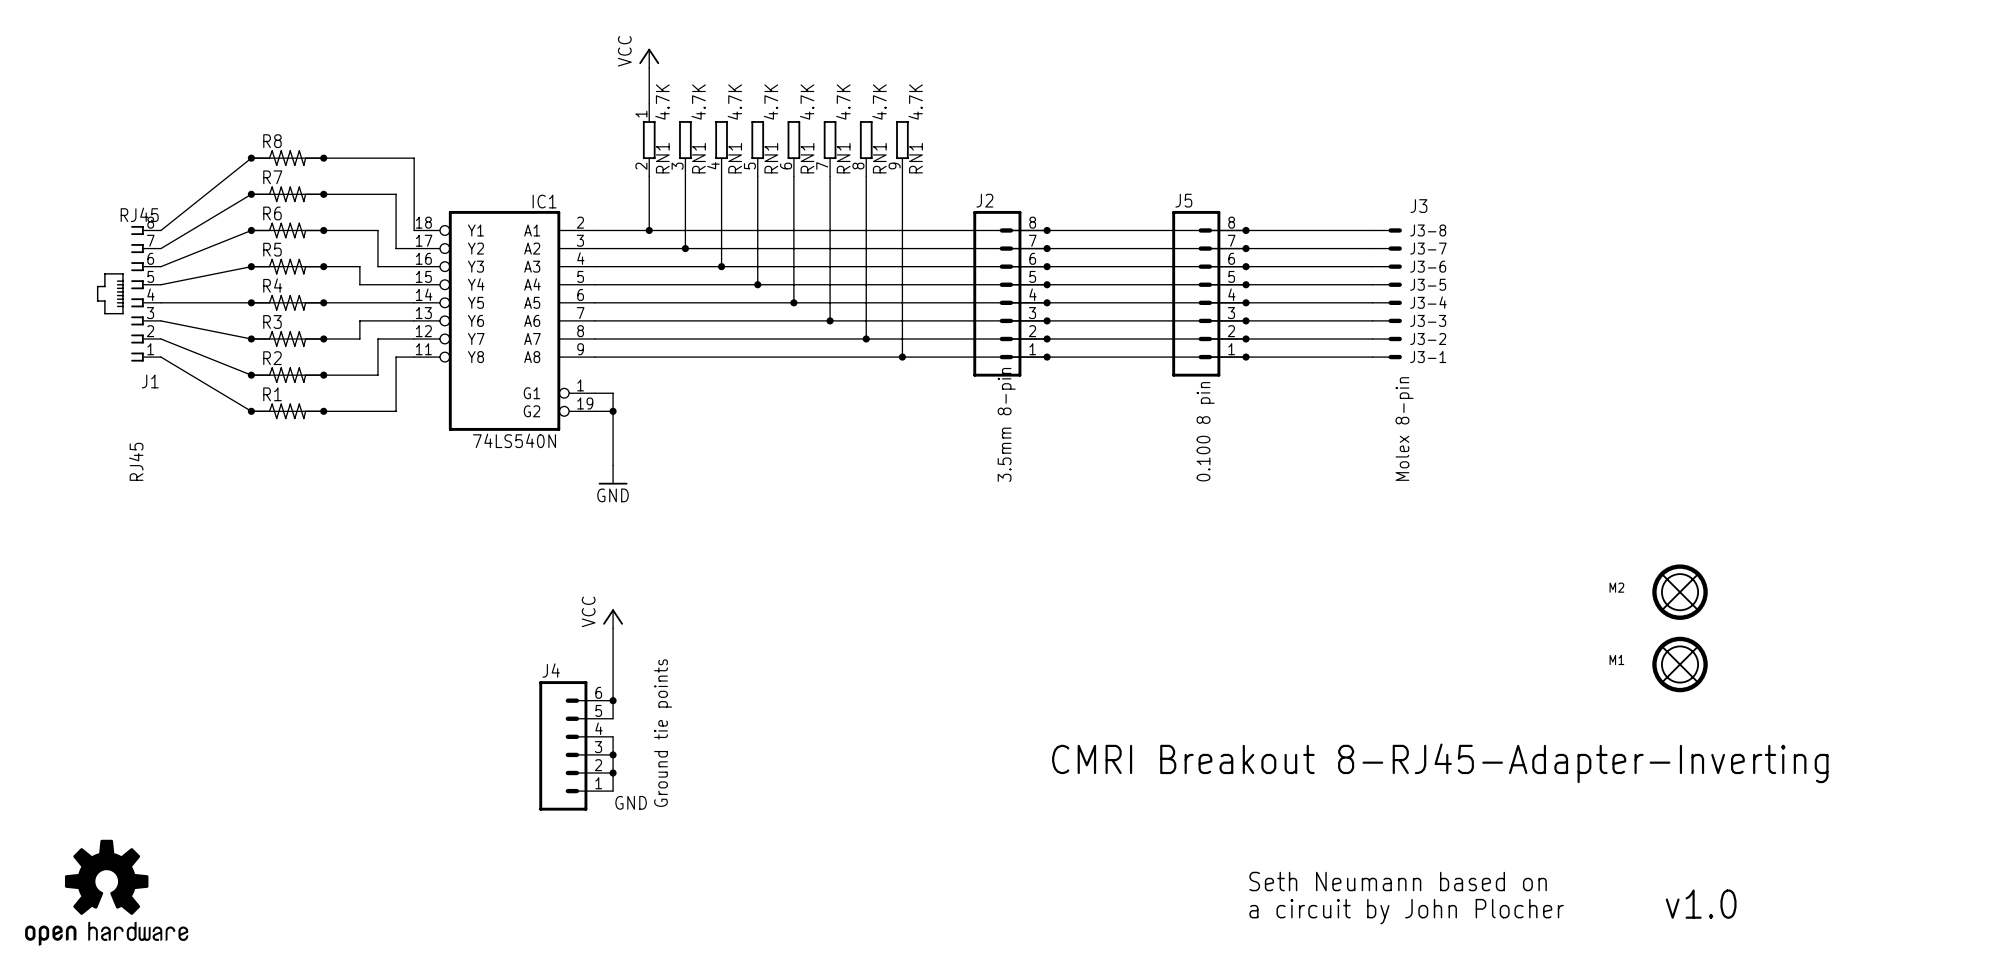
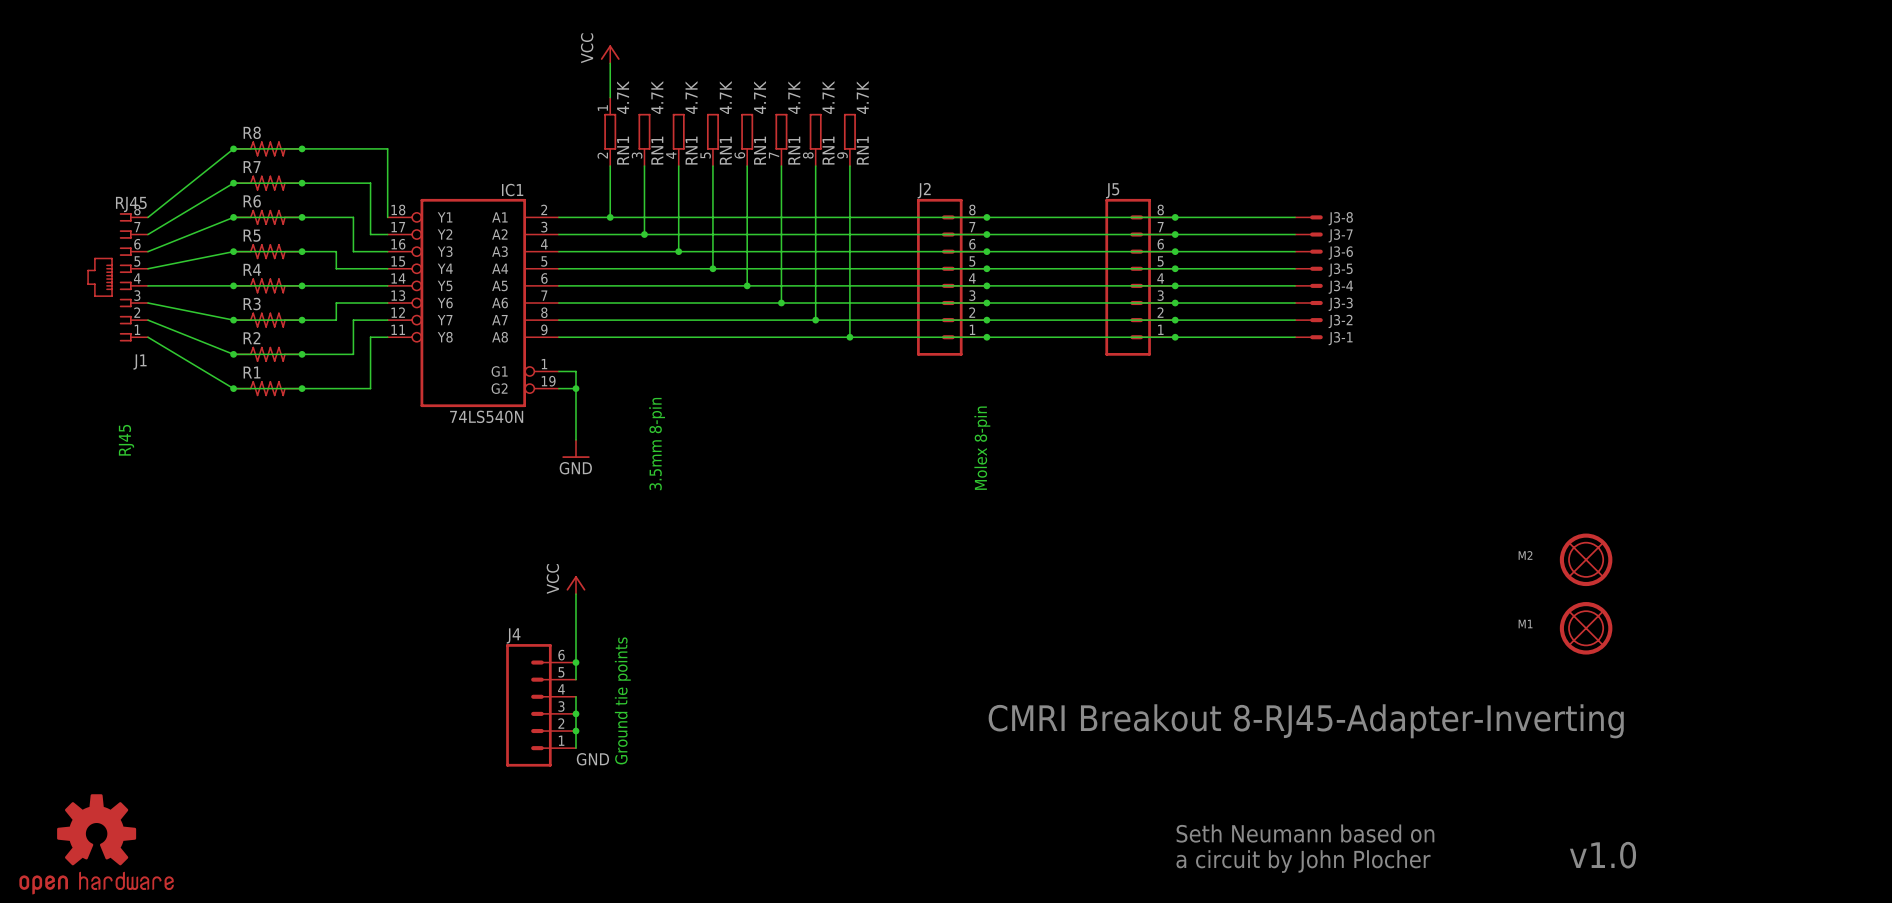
text: J3 (1418, 206) -> none
text: 3.5mm 8-pin (1006, 424) -> none
text: Molex 8-pin (1404, 429) -> none
text: 0.100 8 pin (1205, 431) -> none
text: none -> 3.5mm 8-pin (657, 444)
text: none -> Molex 8-pin (982, 448)

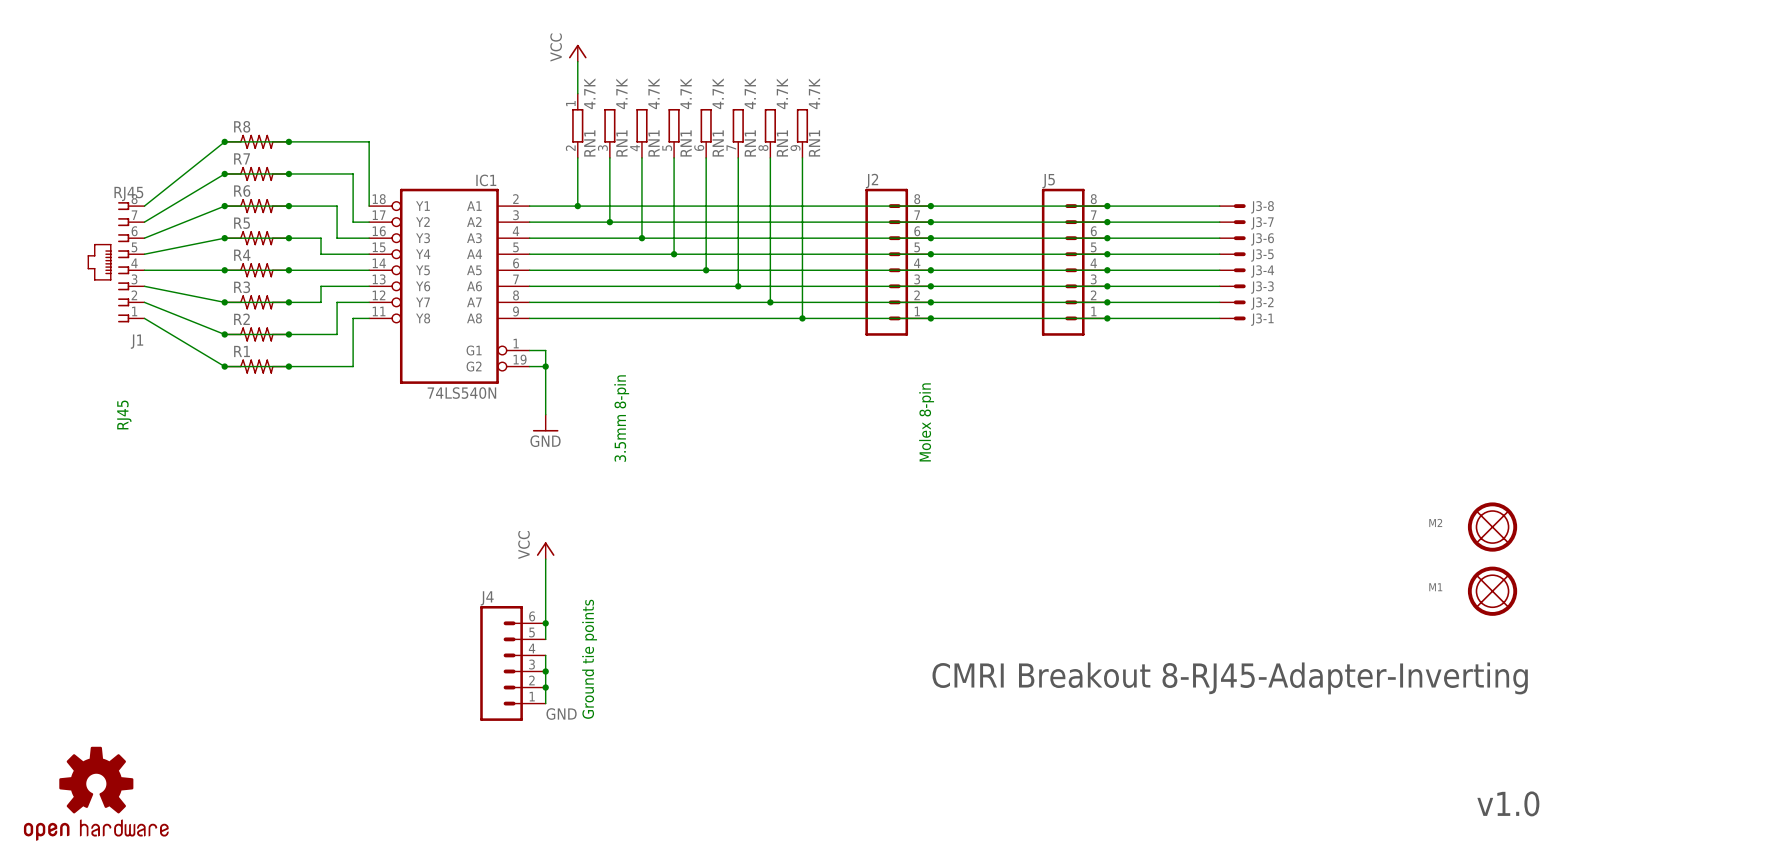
text: Seth Neumann based on (1305, 833) -> none
text: a circuit by John Plocher (1303, 861) -> none

